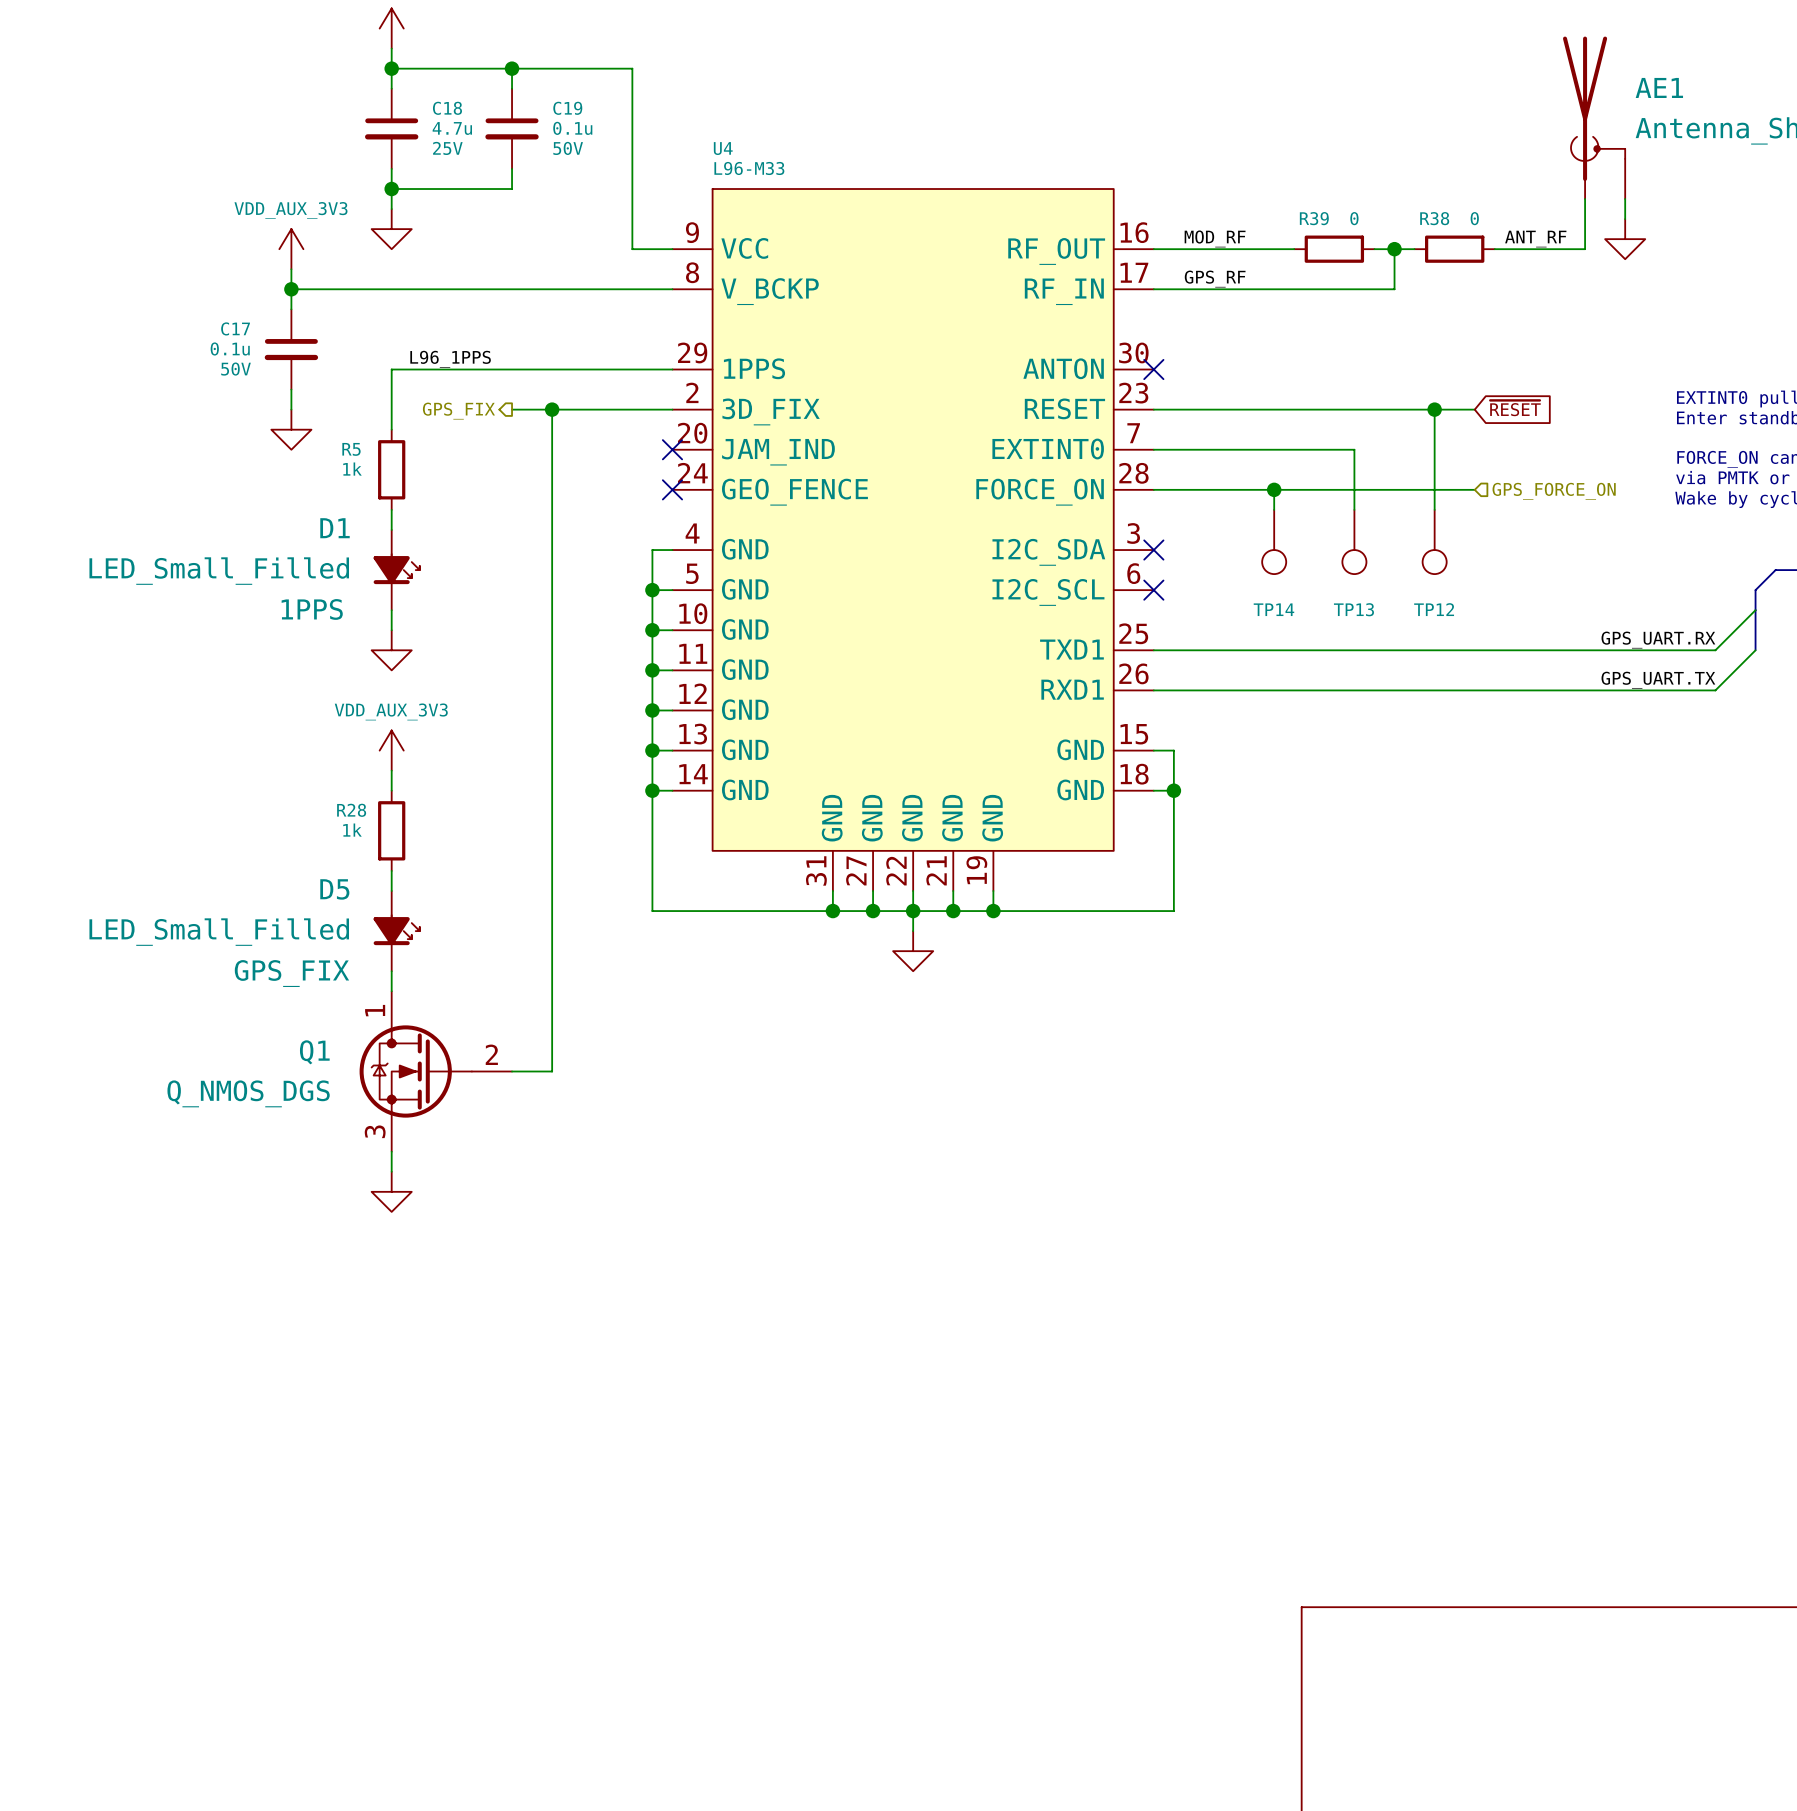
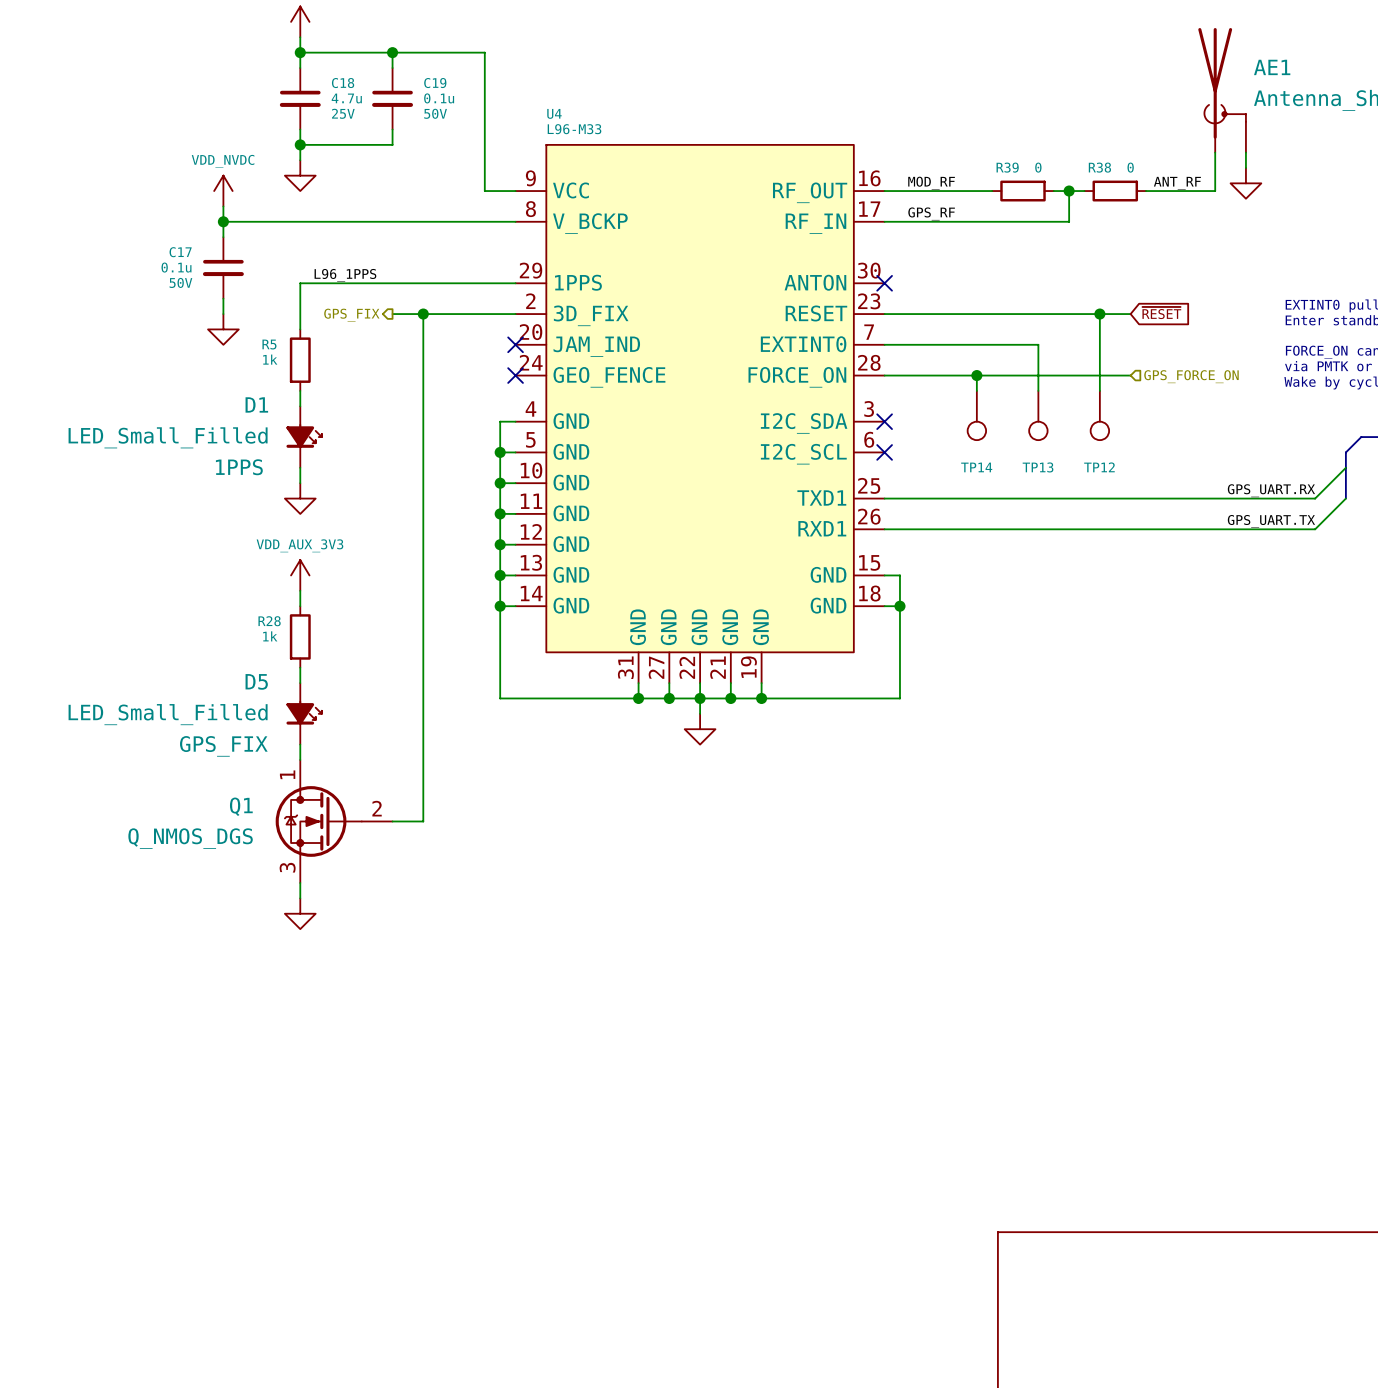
power symbol: VDD_AUX_3V3 (291, 249) -> VDD_NVDC (223, 191)

